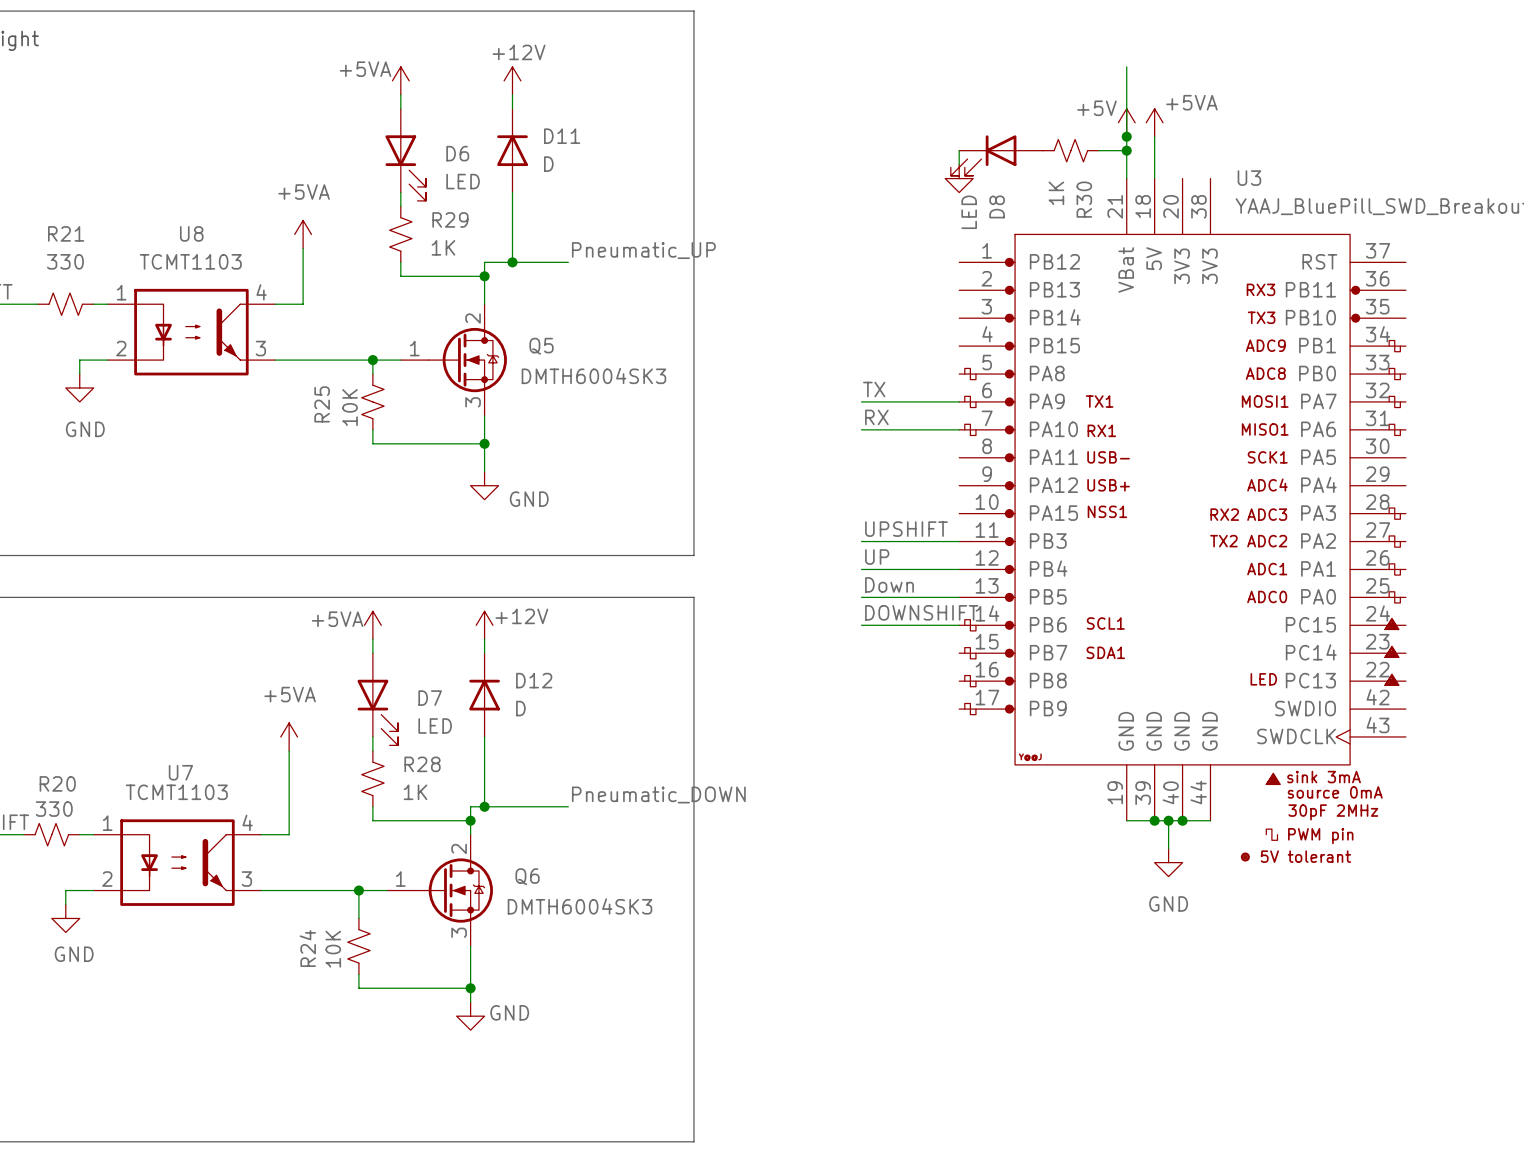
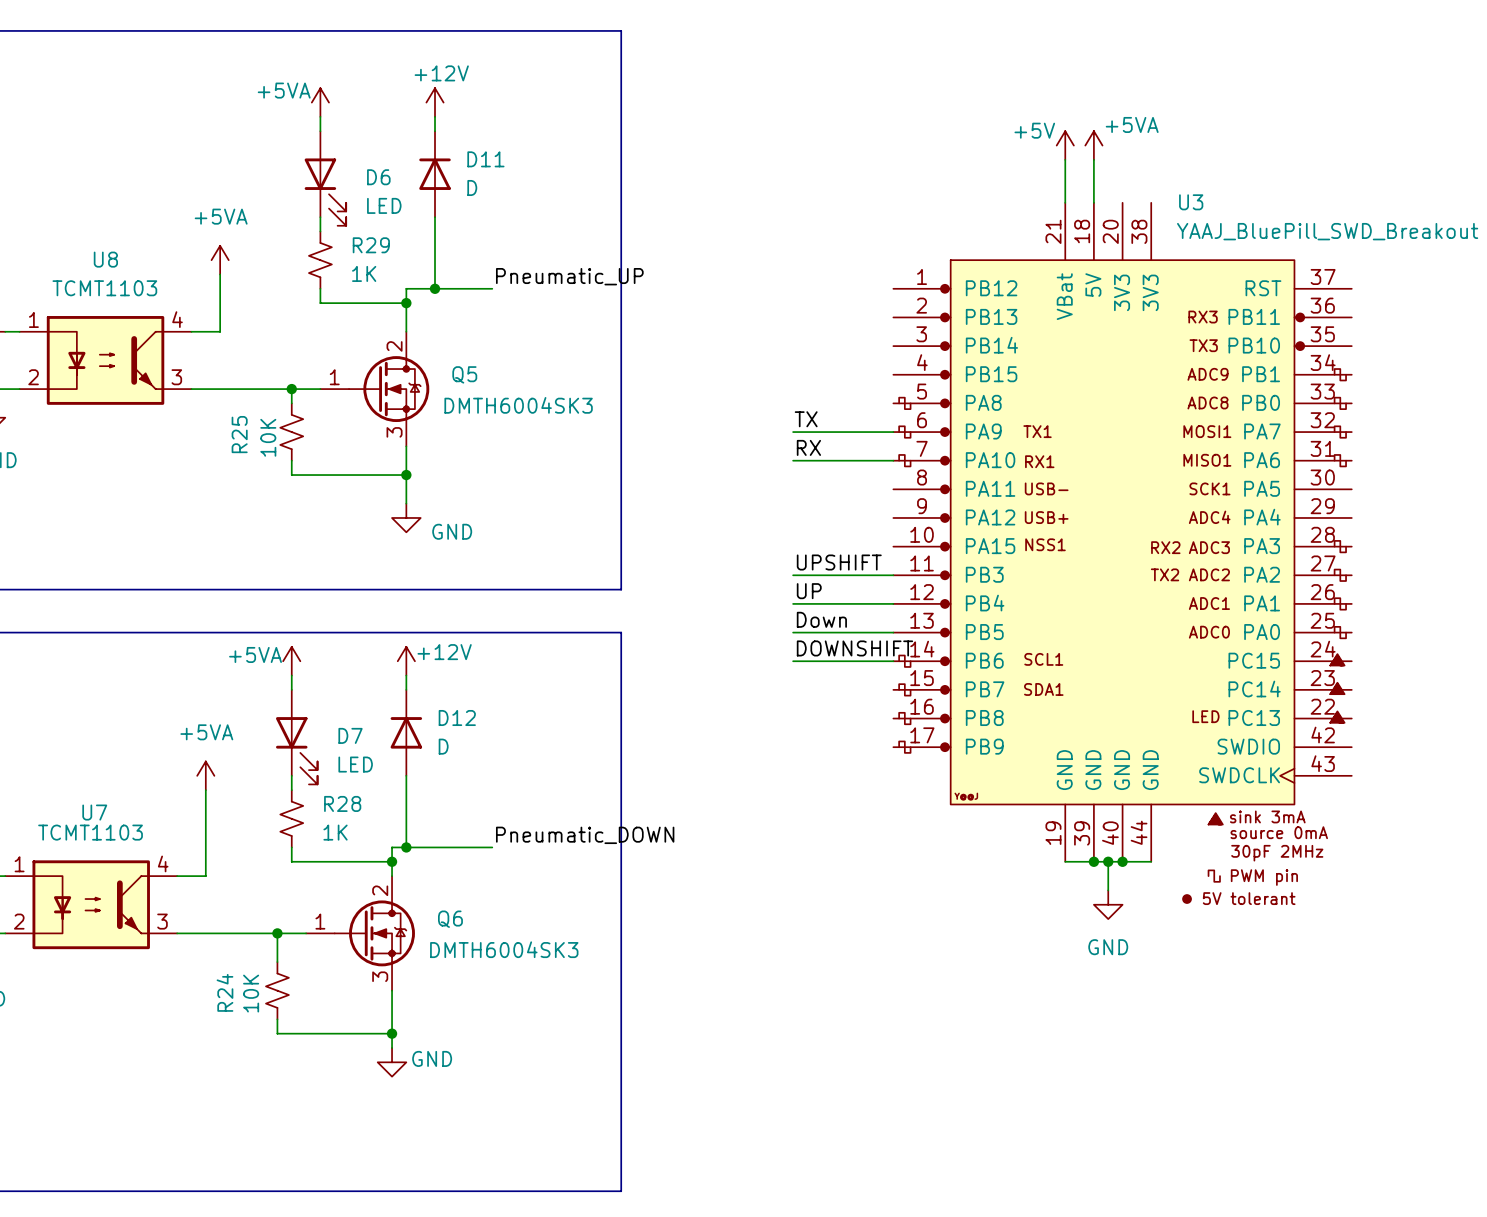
wire: (1126, 66) (1126, 136) -> none
junction: (1126, 136) -> none
wire: (959, 150) (959, 164) -> none
R30: 1K (1070, 150) -> none
wire: (1098, 150) (1126, 150) -> none
junction: (1126, 150) -> none
D8: LED (996, 155) -> none
power symbol: (959, 178) -> none

